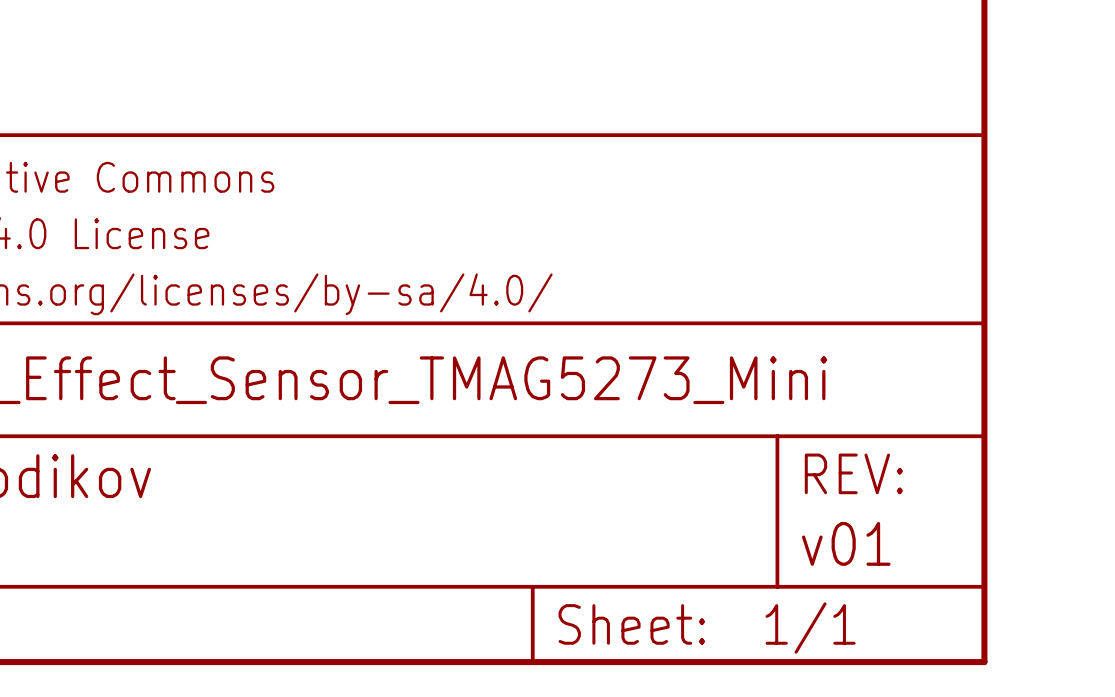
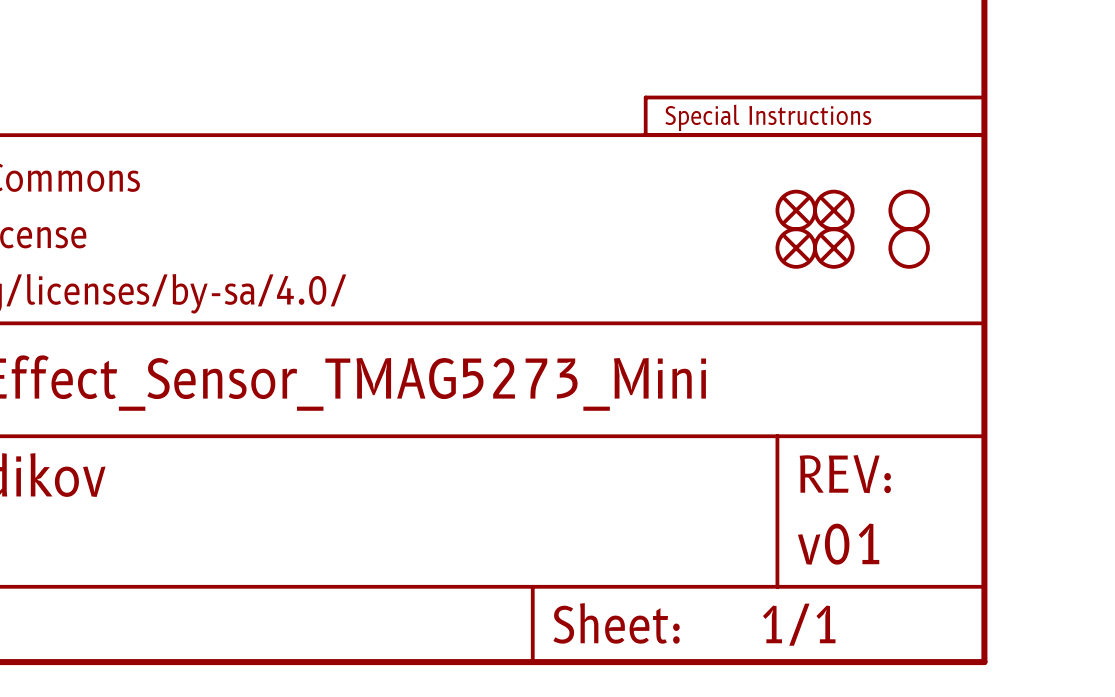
part: none -> (815, 116)
part: none -> (796, 210)
part: none -> (833, 210)
part: none -> (909, 210)
part: none -> (796, 248)
part: none -> (833, 248)
part: none -> (909, 248)

